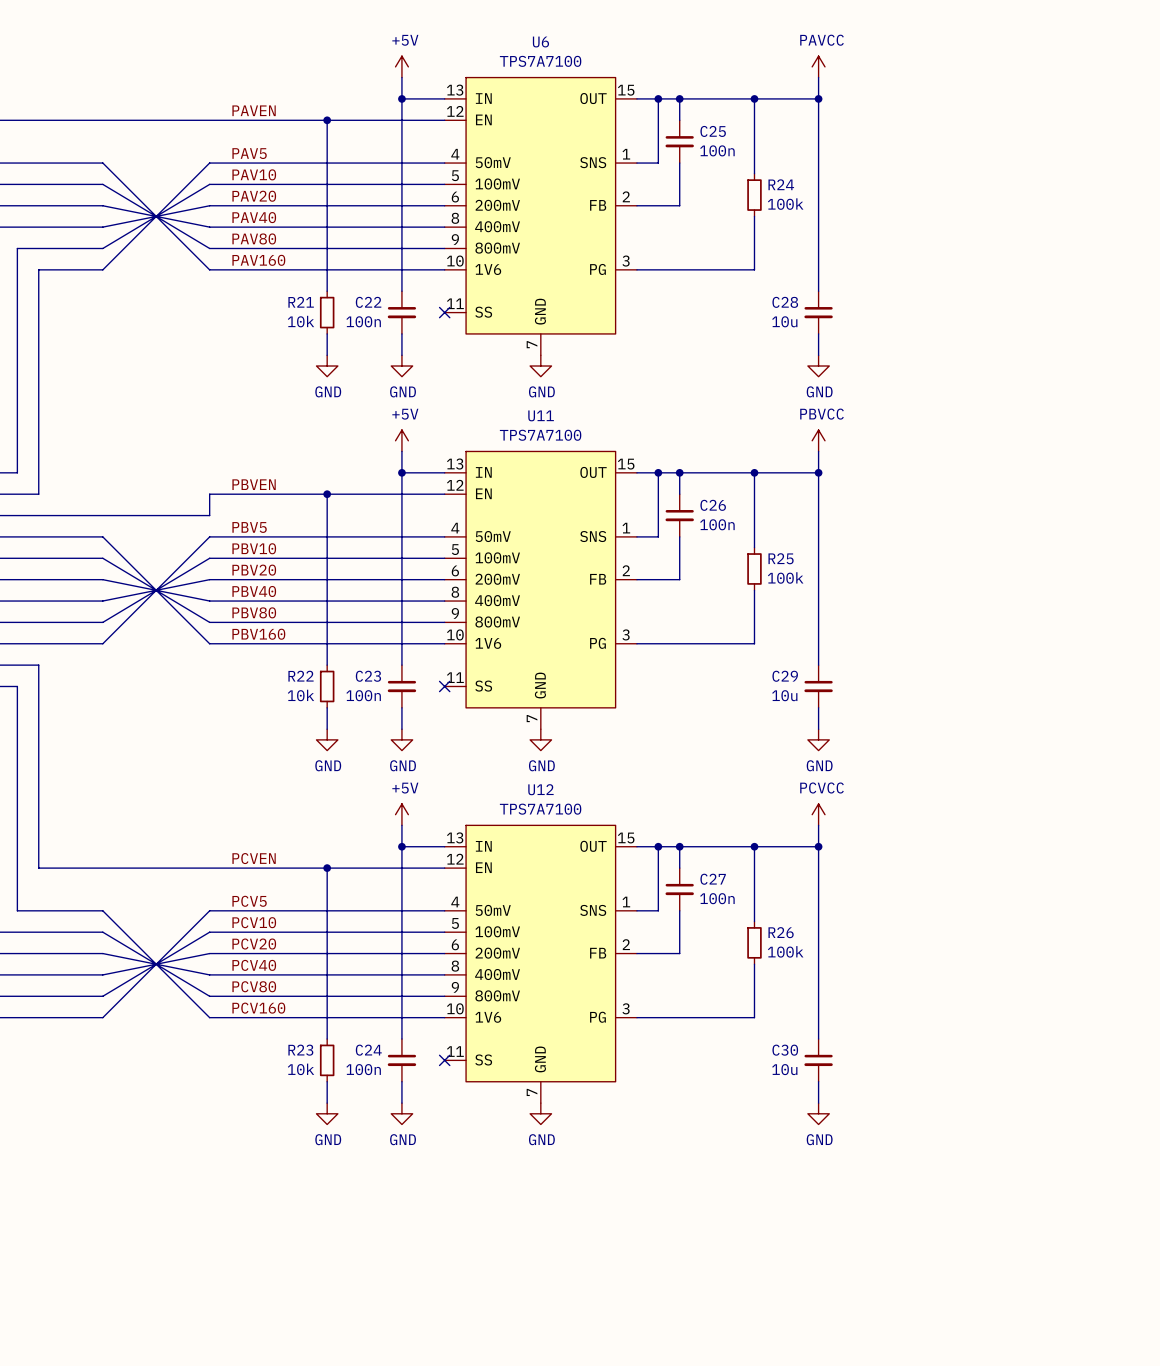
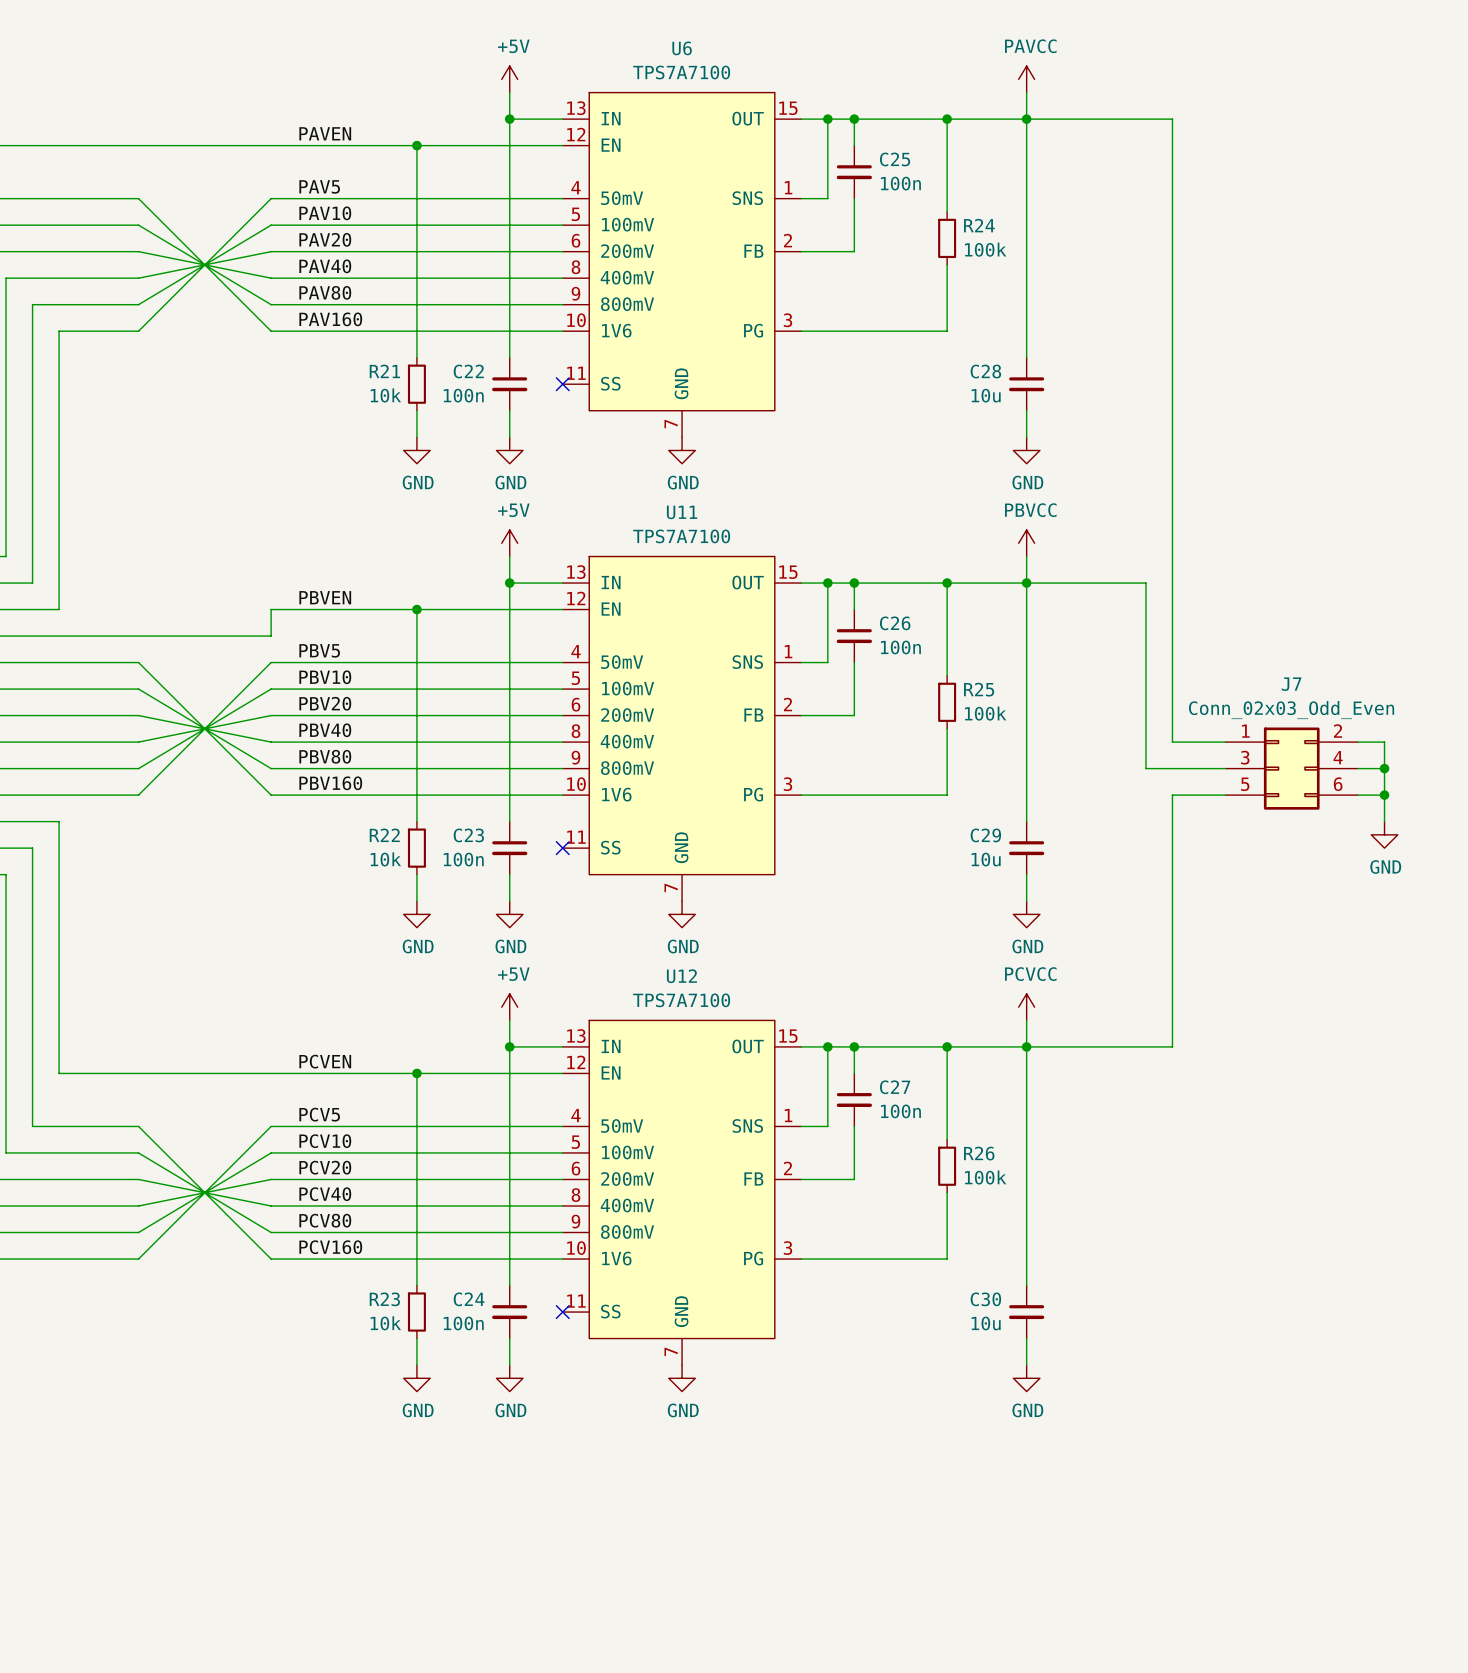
wire: none -> (1026, 119) (1172, 119) (1172, 742) (1225, 742)
wire: none -> (1026, 583) (1145, 583) (1145, 768) (1225, 768)
wire: none -> (1358, 742) (1384, 742) (1384, 821)
J7: none -> Conn_02x03_Odd_Even (1291, 768)
wire: none -> (1358, 768) (1384, 768)
junction: none -> (1384, 768)
wire: none -> (1225, 795) (1172, 795) (1172, 1046) (1026, 1046)
wire: none -> (1358, 795) (1384, 795)
junction: none -> (1384, 795)
power symbol: none -> GND (1384, 834)

